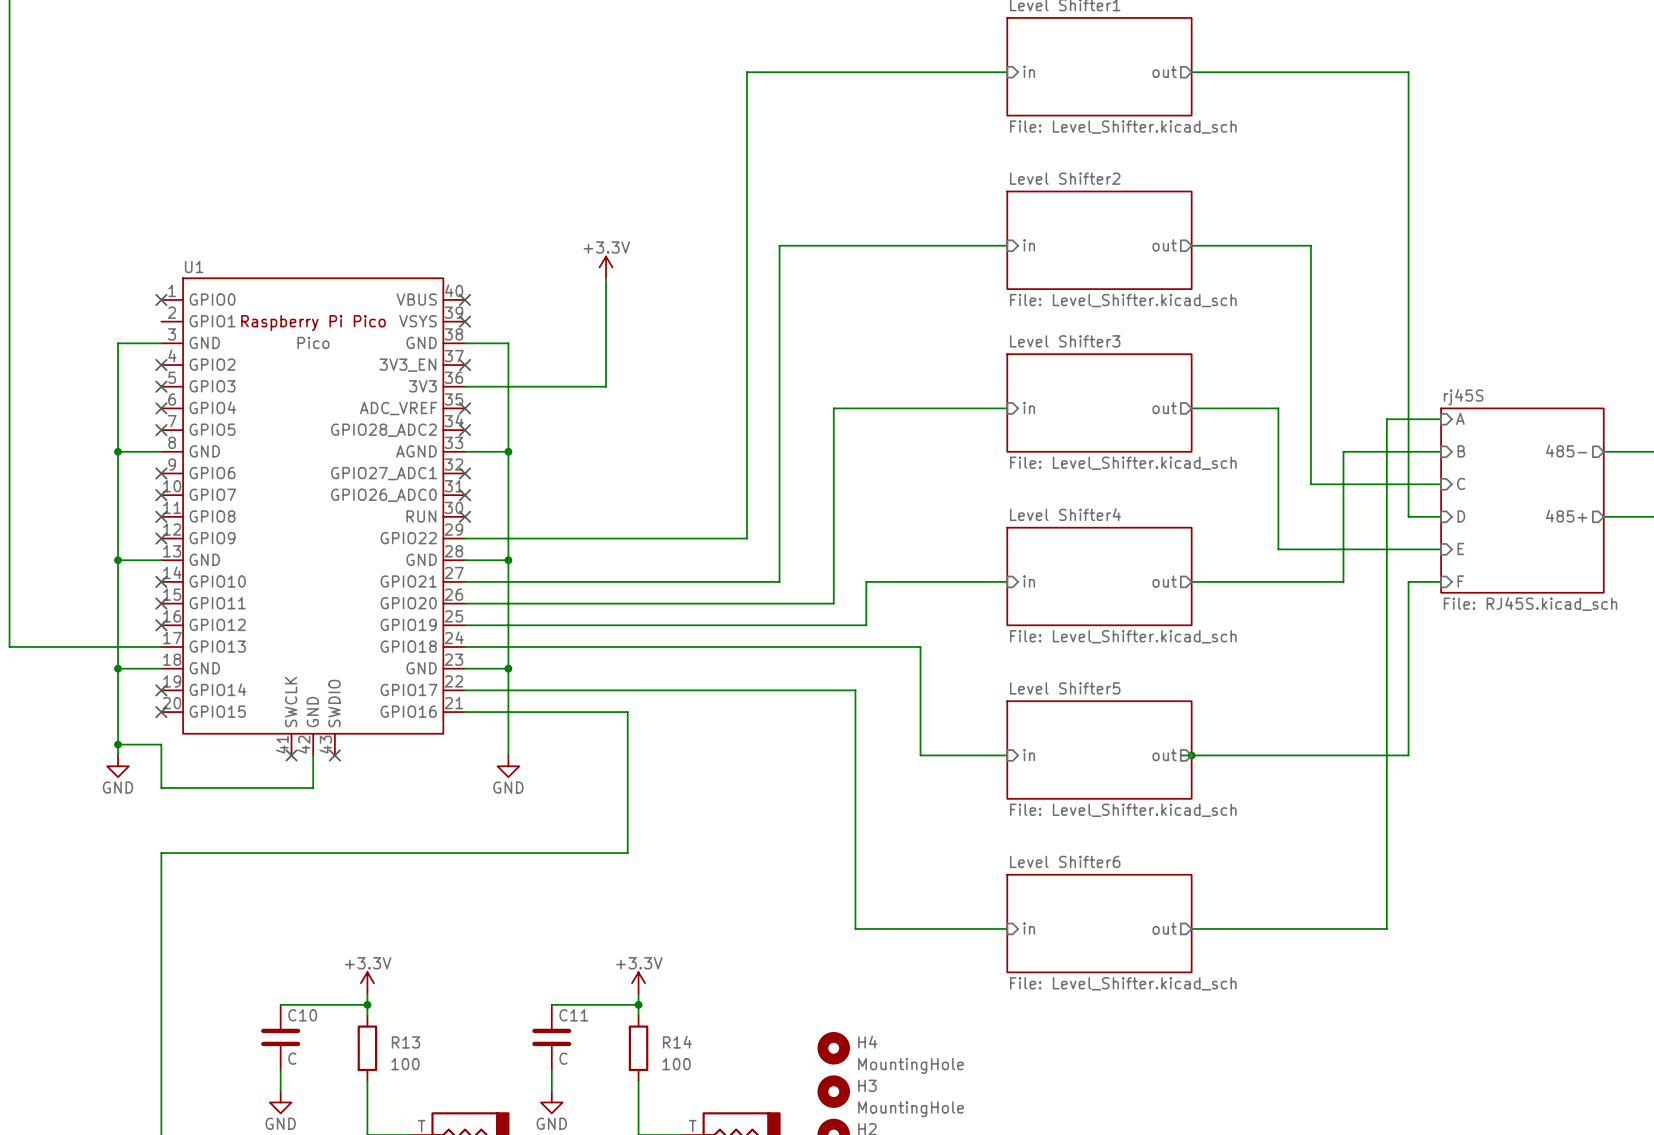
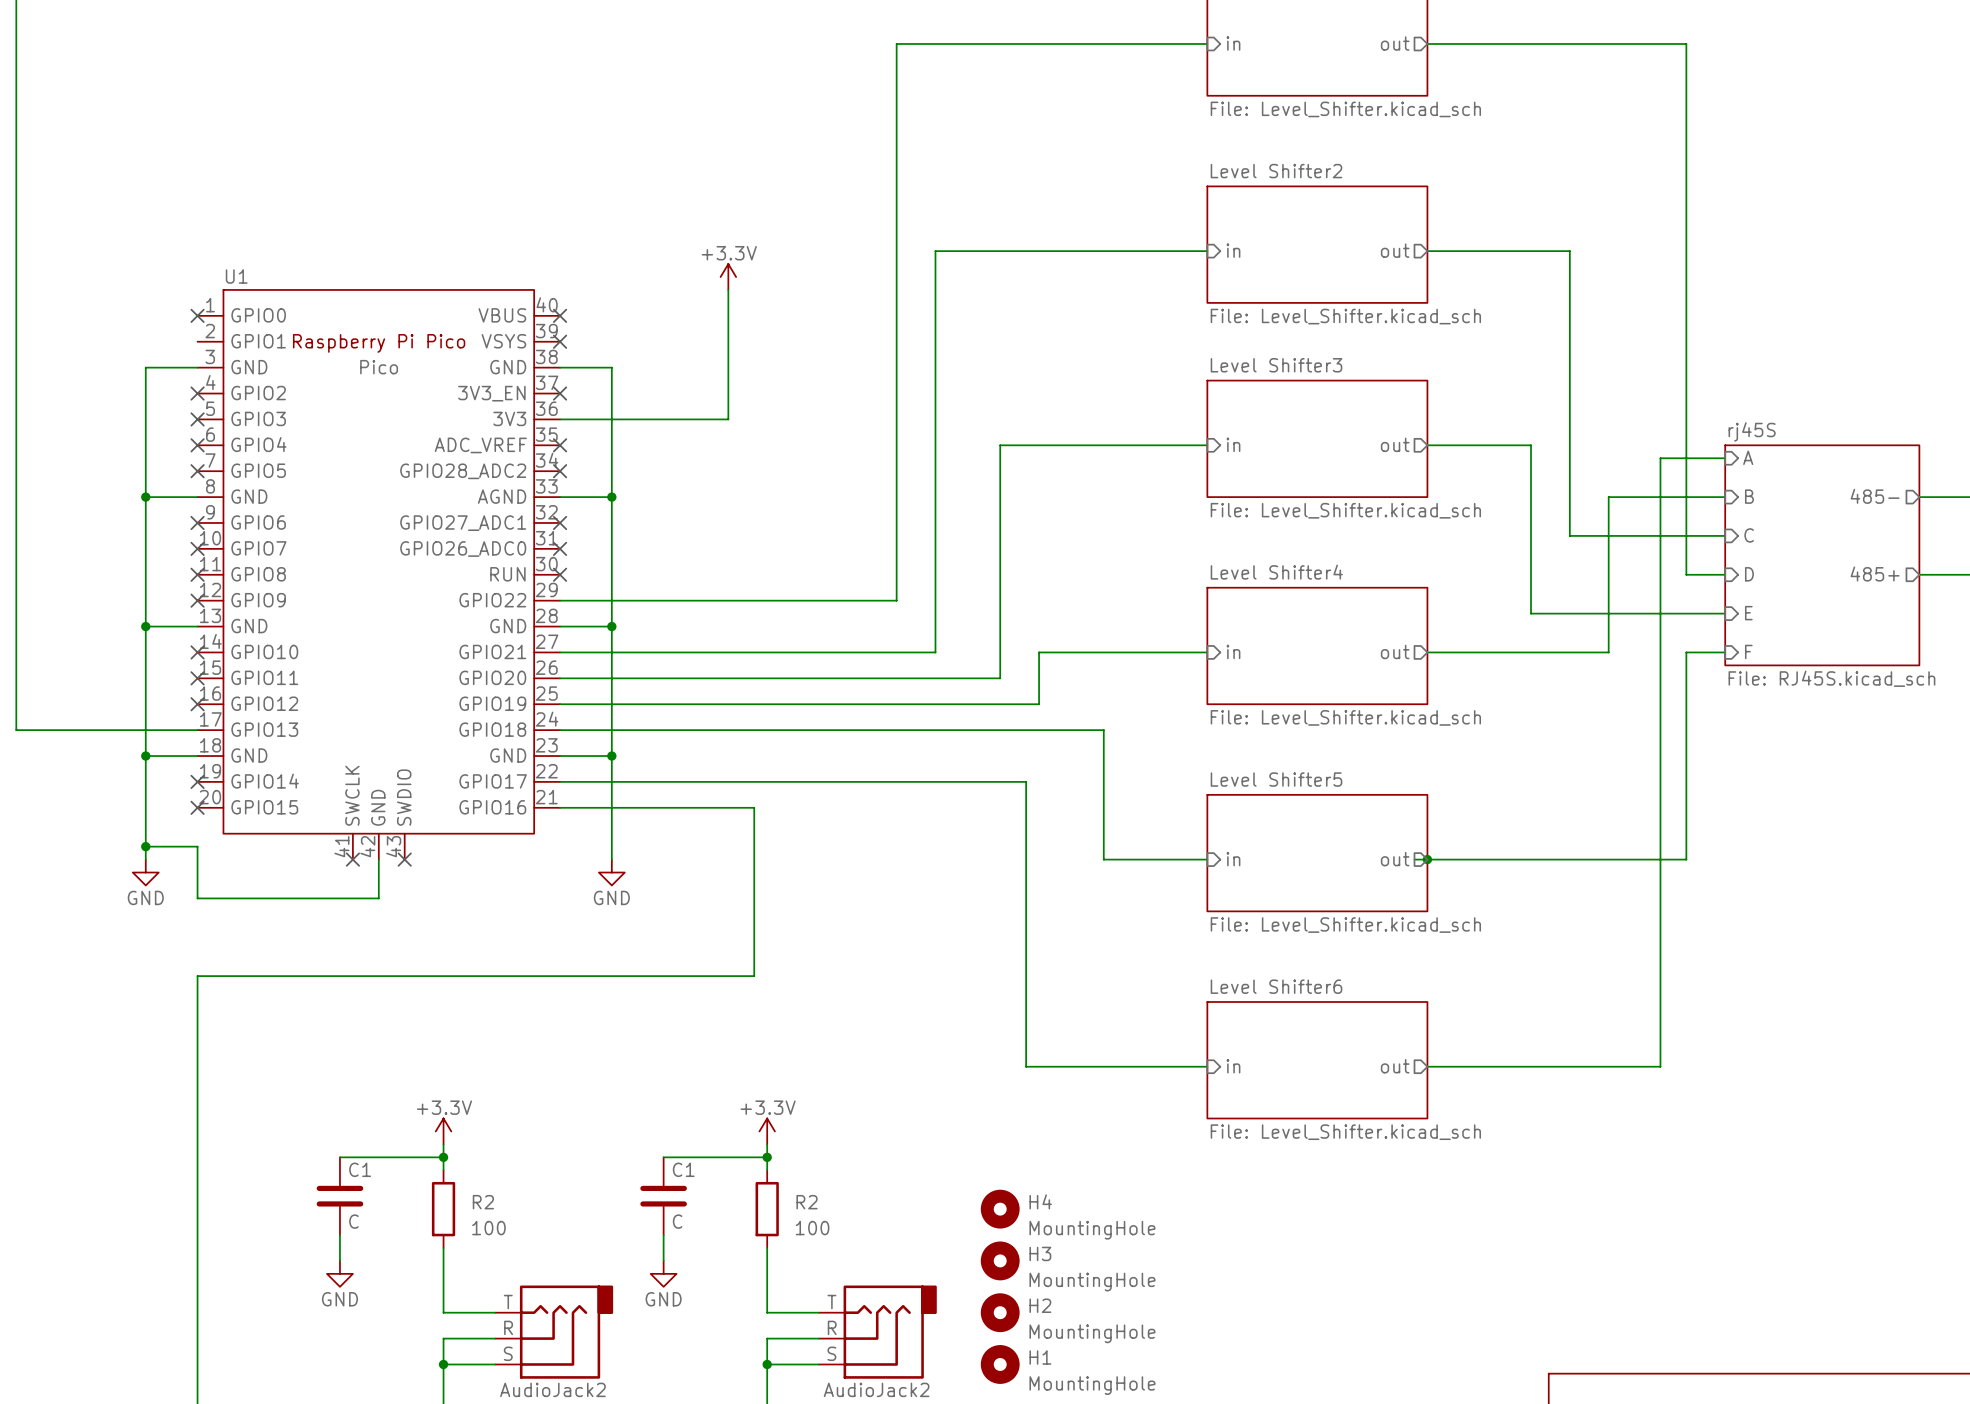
C10 name: C10 (302, 1015) -> C1 (360, 1169)
C11 name: C11 (573, 1015) -> C1 (683, 1169)
R13 name: R13 (405, 1042) -> R2 (483, 1202)
R14 name: R14 (677, 1042) -> R2 (807, 1202)

